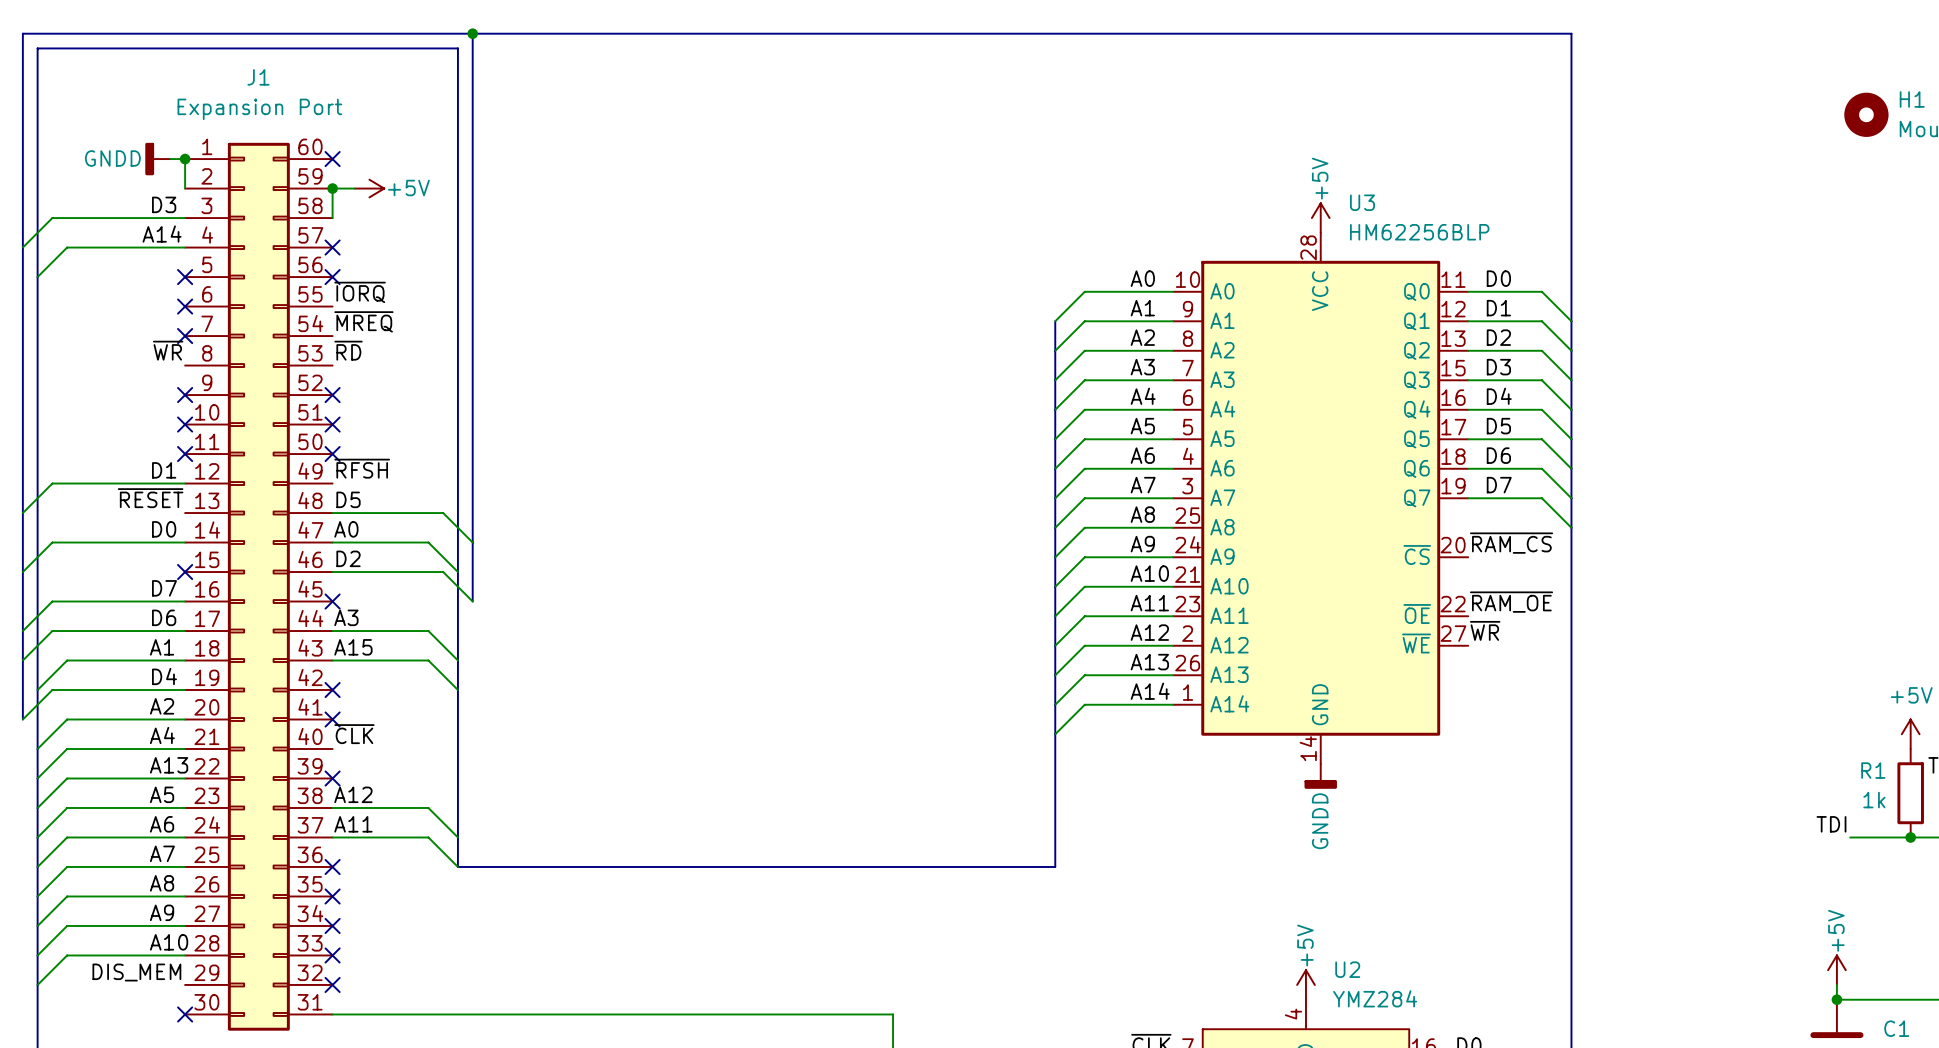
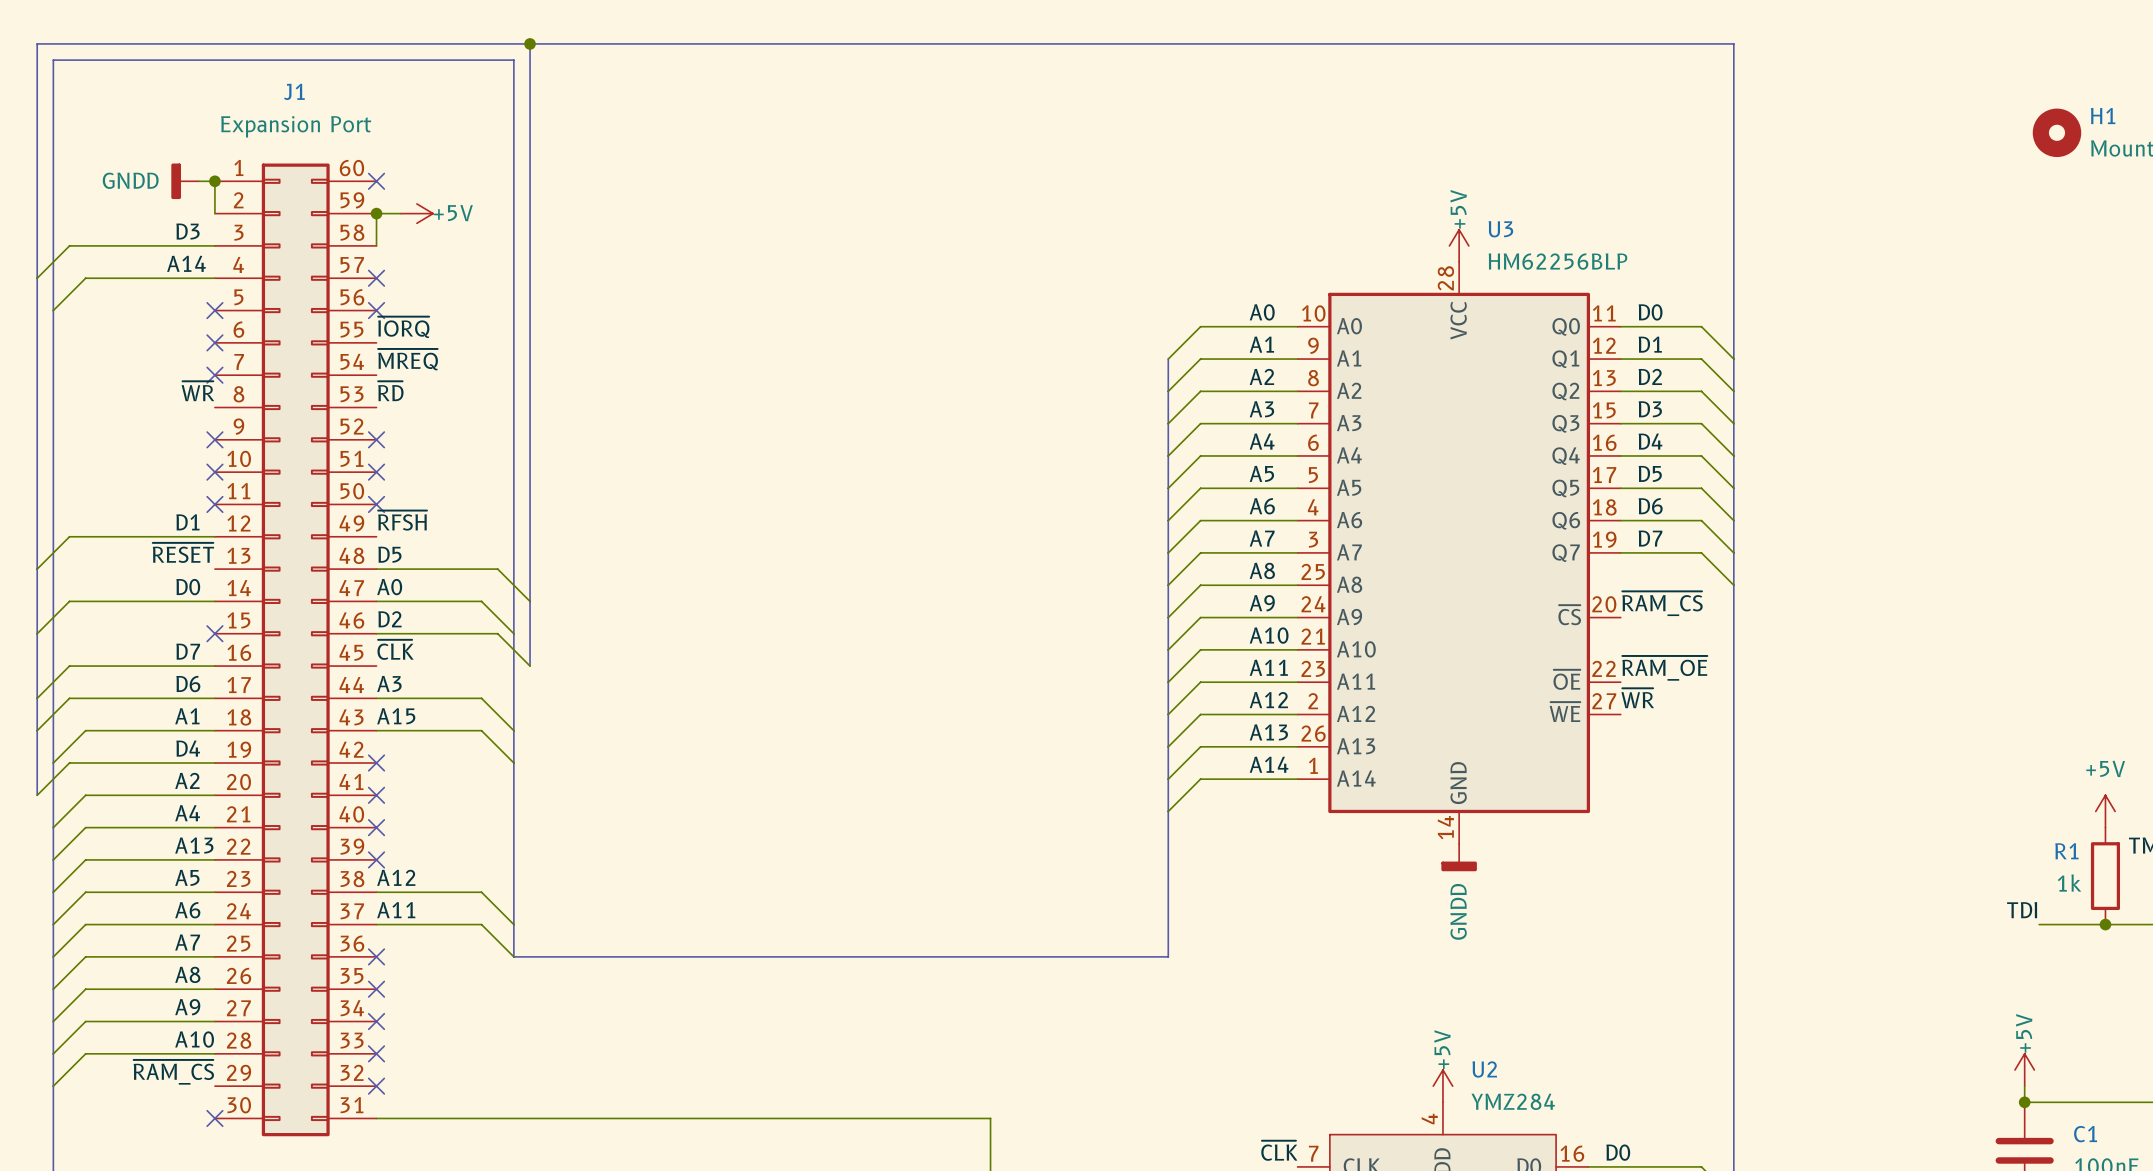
no-connect mark: (332, 601) -> none
label position: ~{CLK} (354, 734) -> ~{CLK} (395, 649)
no-connect mark: none -> (376, 827)
label: DIS_MEM (136, 972) -> ~{RAM_CS} (173, 1072)

